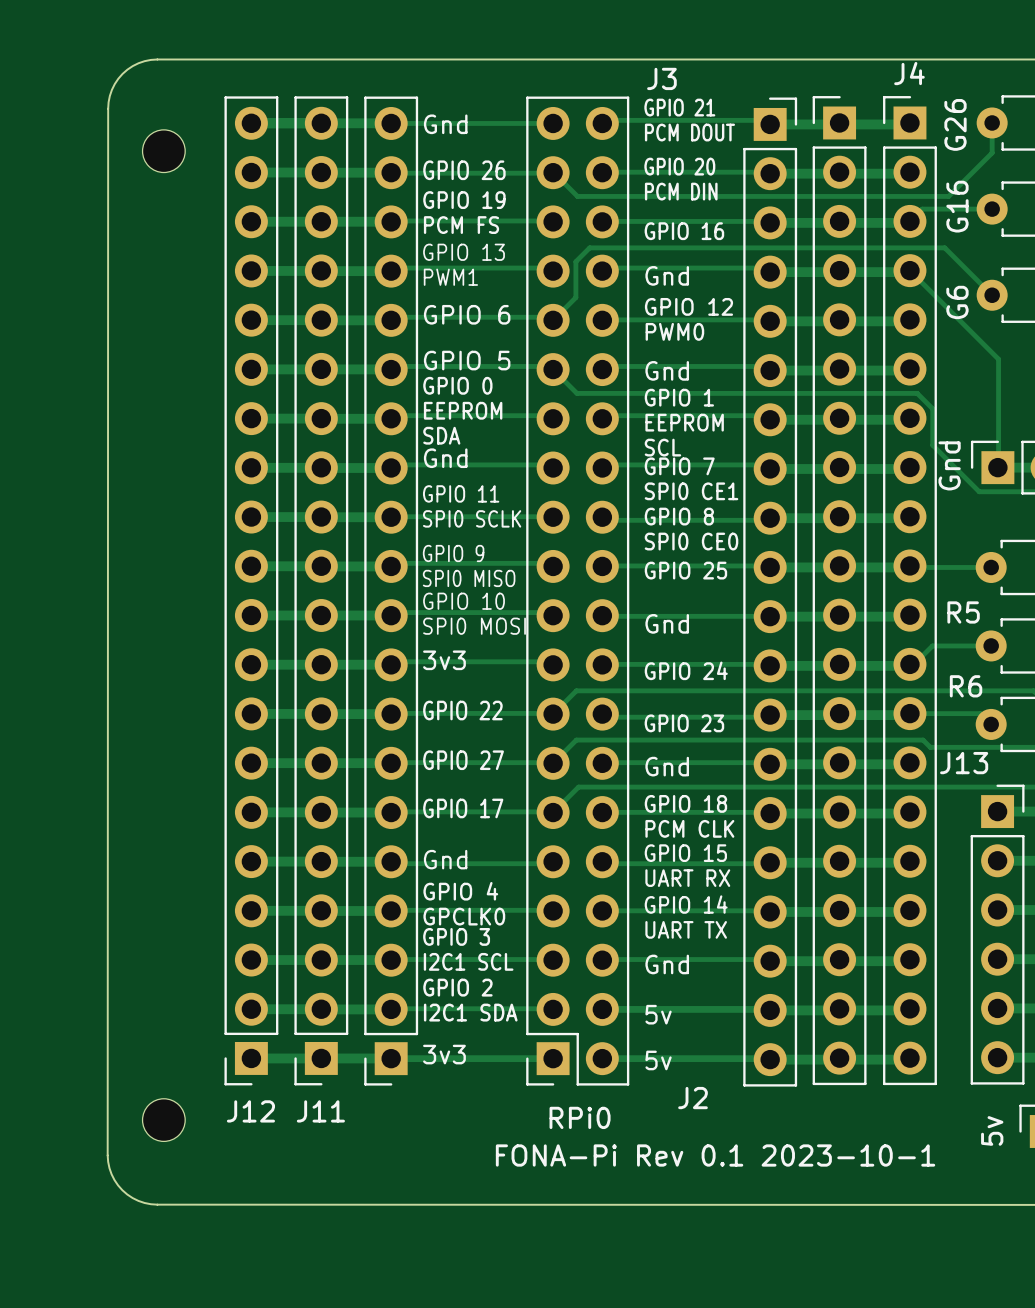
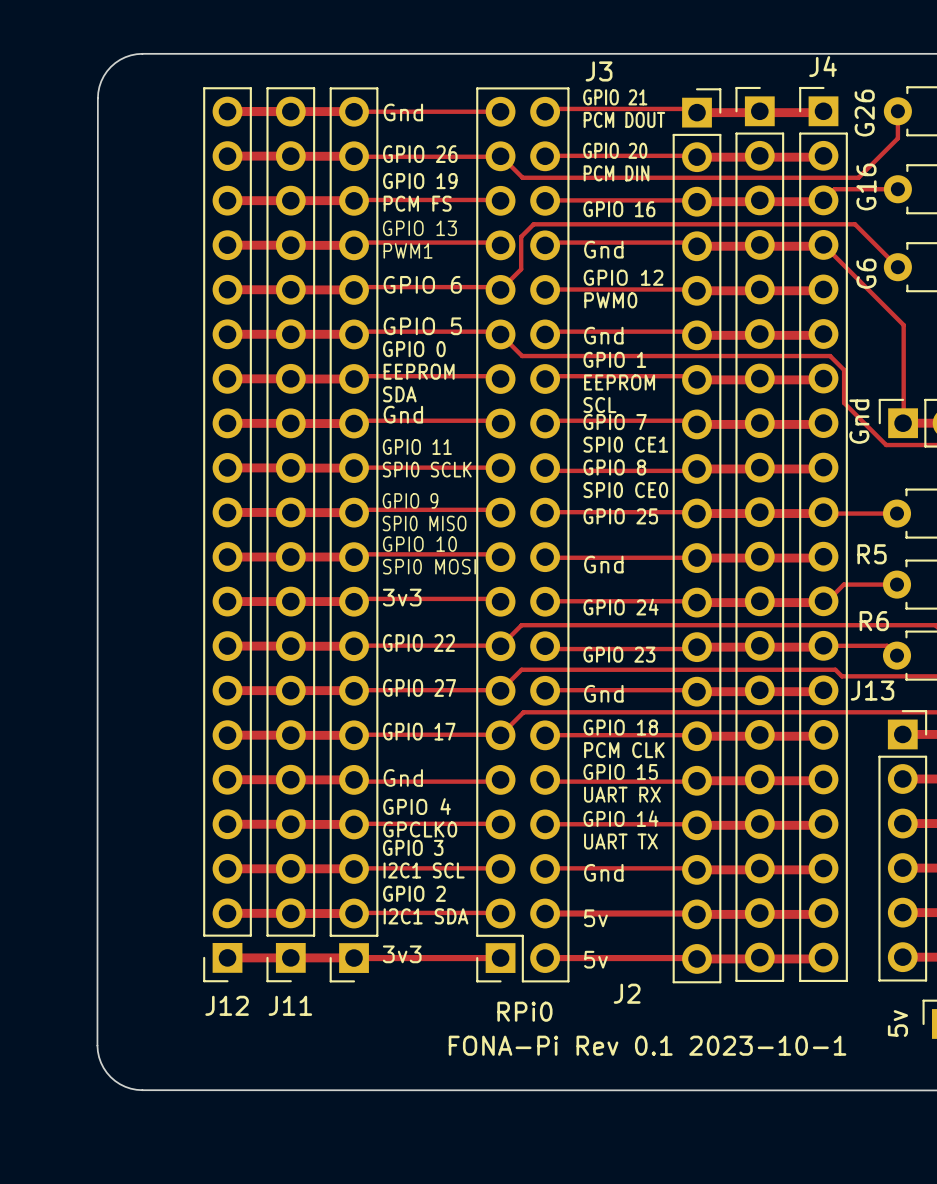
part: (163, 151) -> none
part: (163, 1120) -> none

